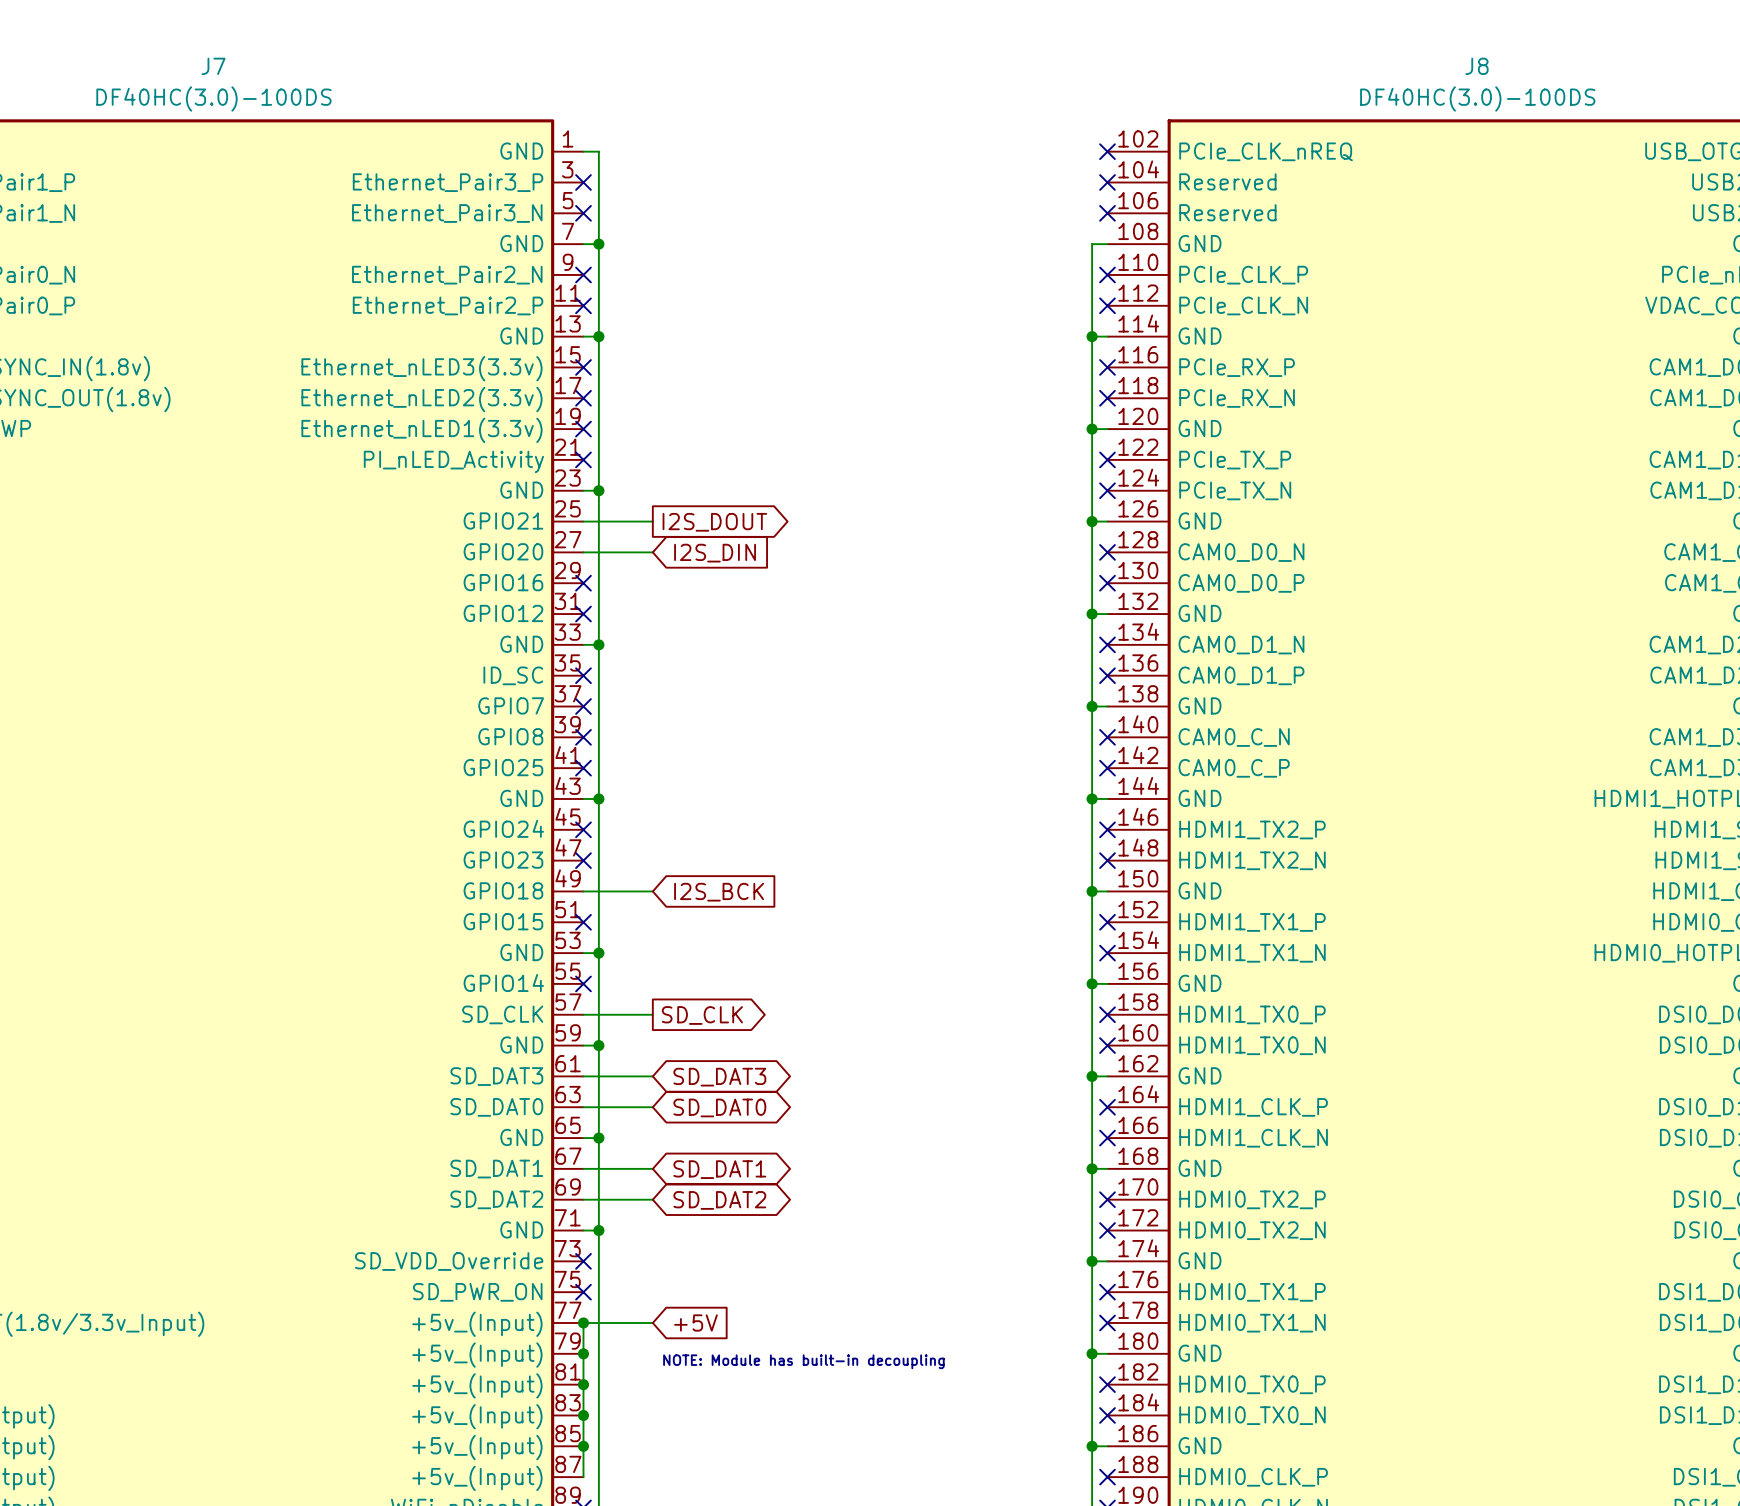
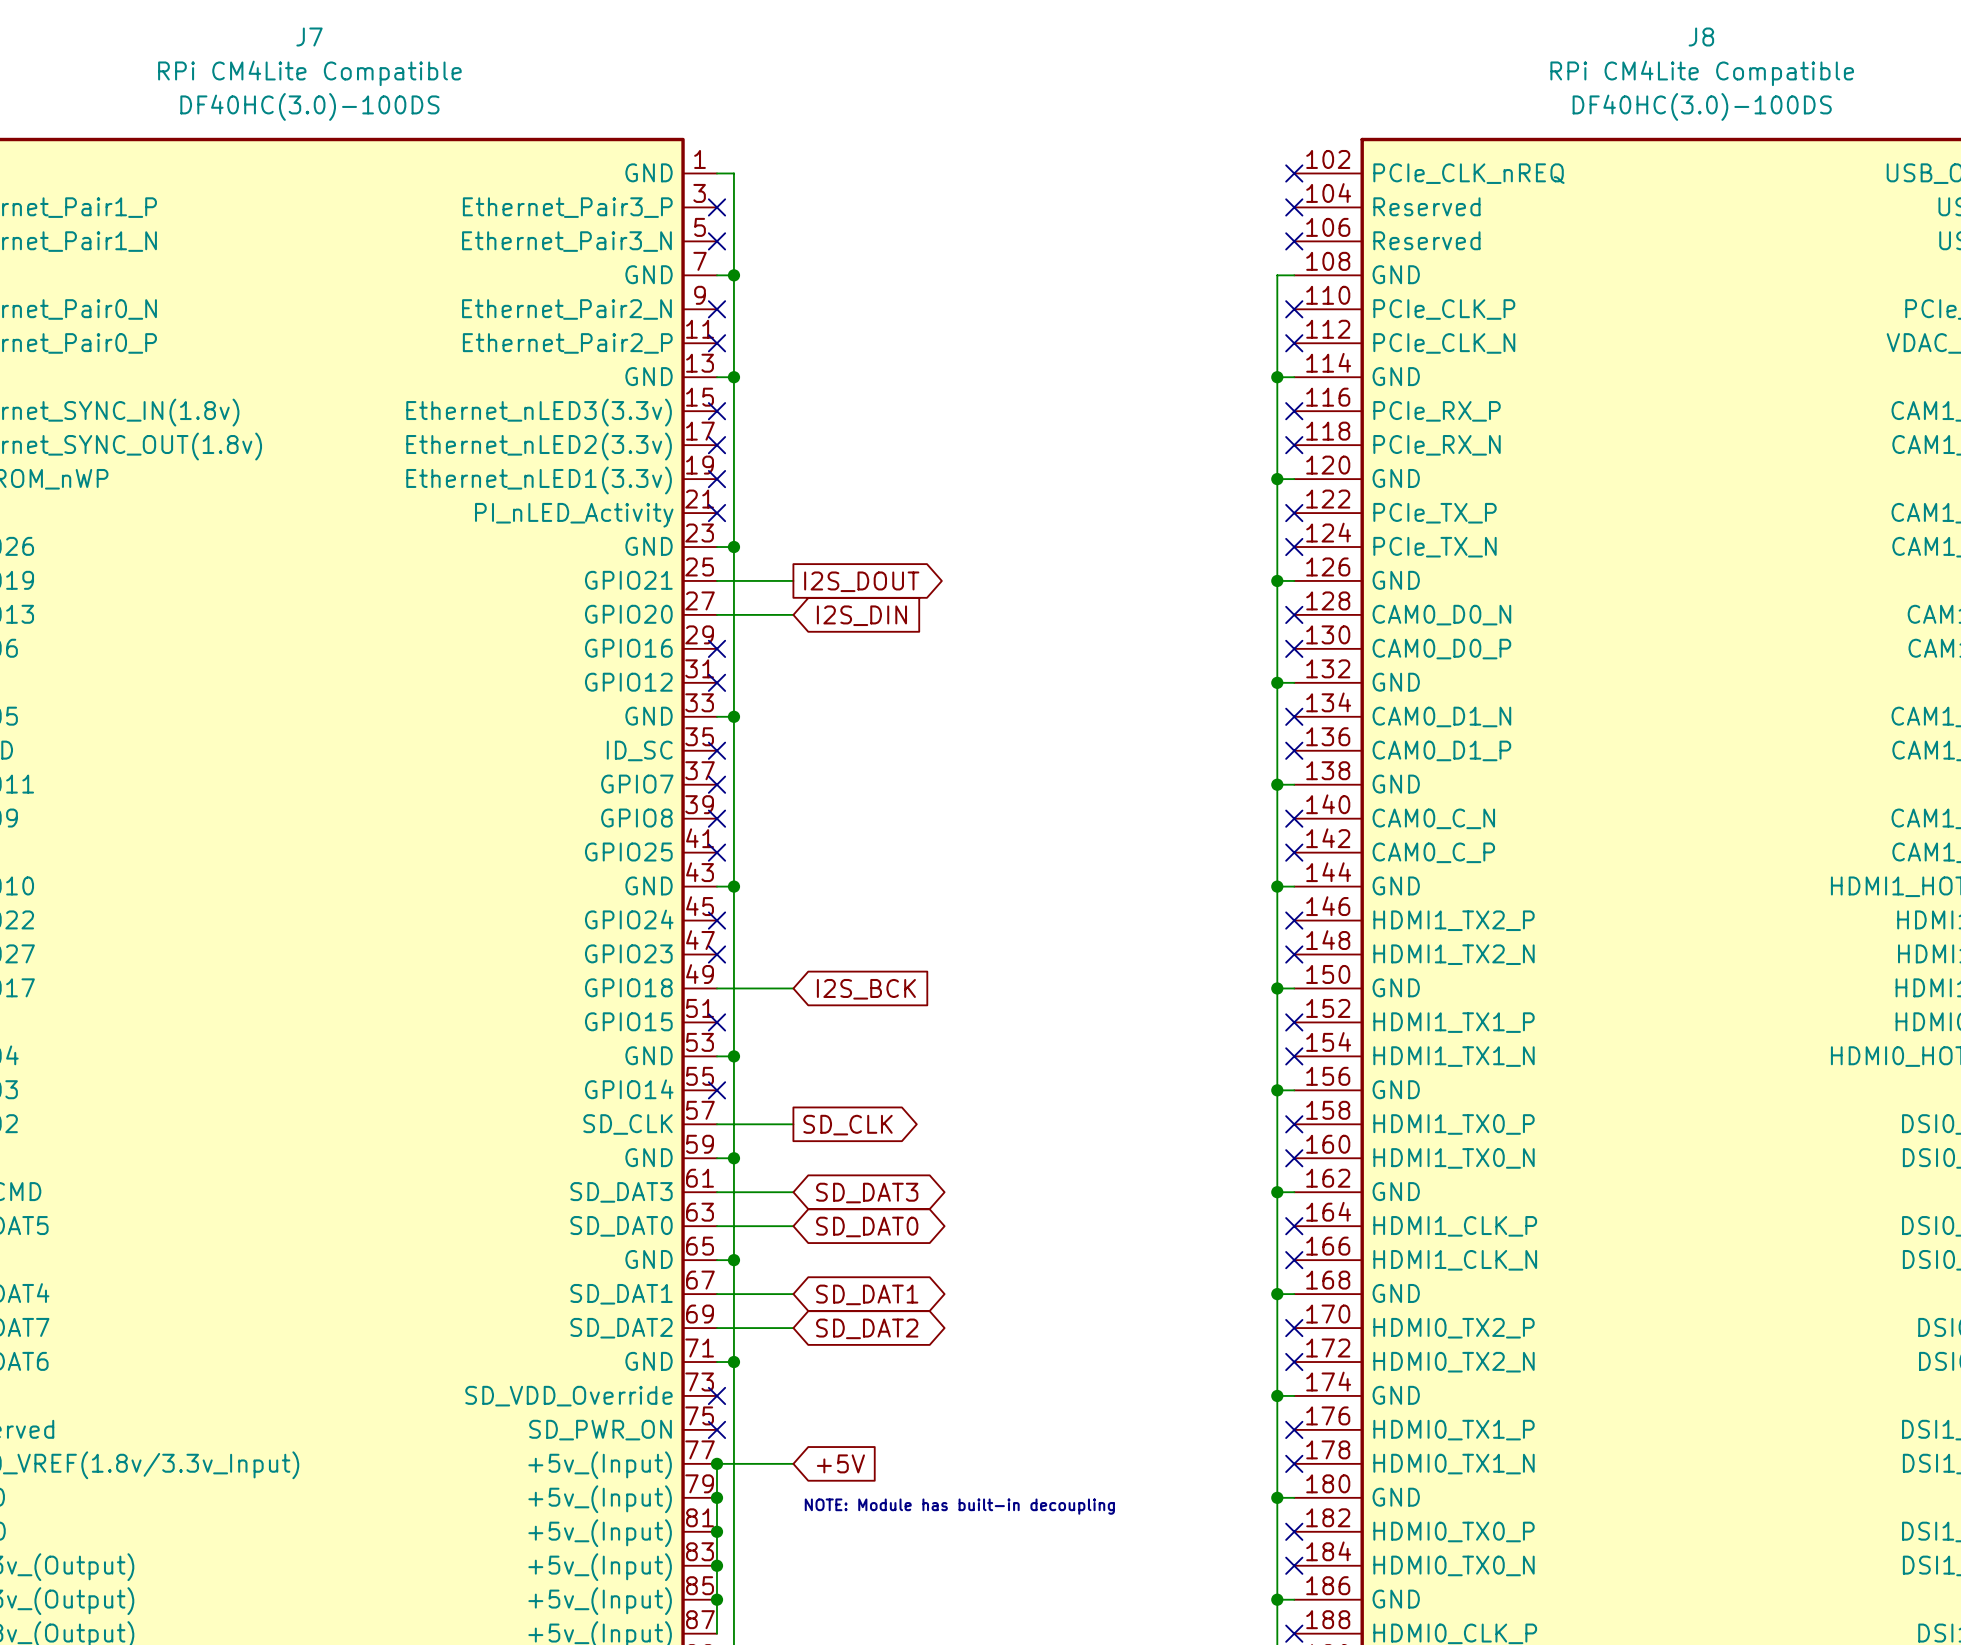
J7 name position: J7 (213, 66) -> J7 (309, 37)
J8 name position: J8 (1477, 66) -> J8 (1701, 37)
J7 text: none -> DF40HC(3.0)-100DS (309, 106)
J8 text: none -> DF40HC(3.0)-100DS (1702, 106)
J7 value: DF40HC(3.0)-100DS (213, 98) -> RPi CM4Lite Compatible (309, 73)
J8 value: DF40HC(3.0)-100DS (1477, 98) -> RPi CM4Lite Compatible (1702, 73)

